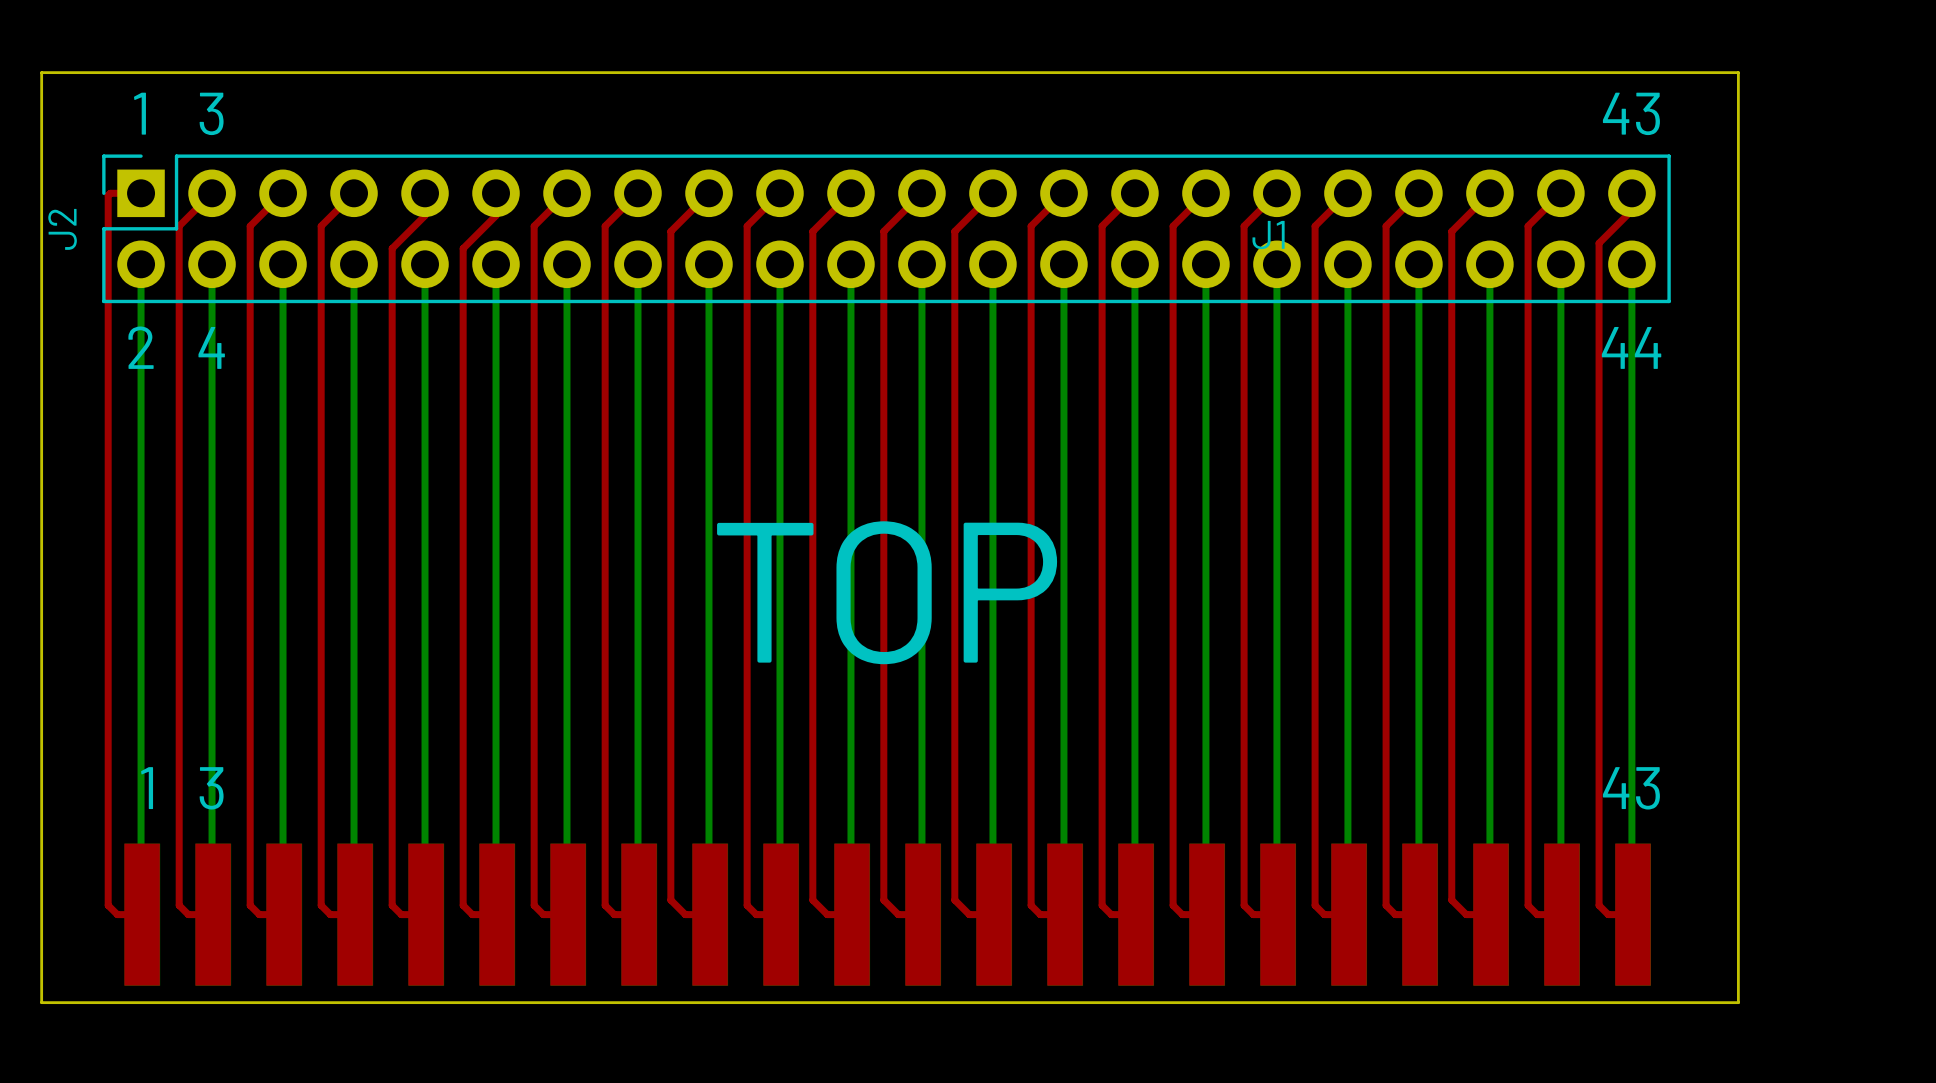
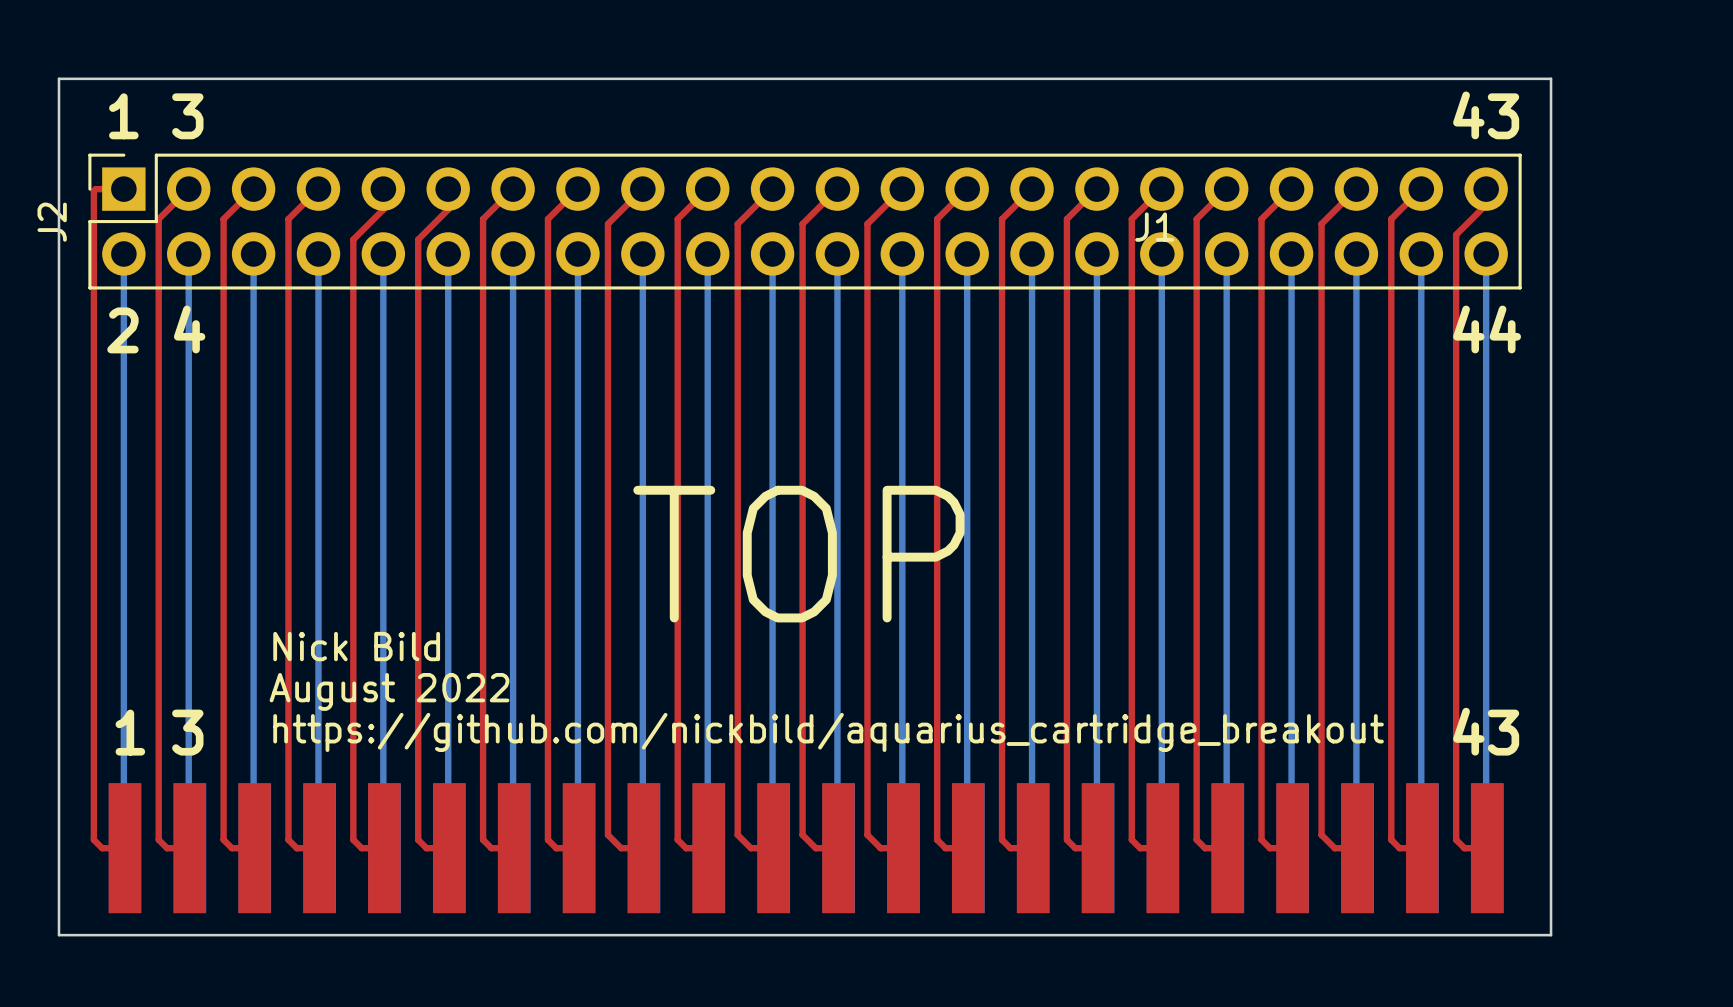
board edge: (70, 72) (41, 72) (41, 1002) (1738, 1002) (1738, 72) (1702, 72) -> (58, 78) (58, 935) (1551, 935) (1551, 78)
text: none -> Nick Bild (356, 646)
text: none -> August 2022 (389, 691)
text: none -> https://github.com/nickbild/aquarius_cartridge_breakout (828, 732)

